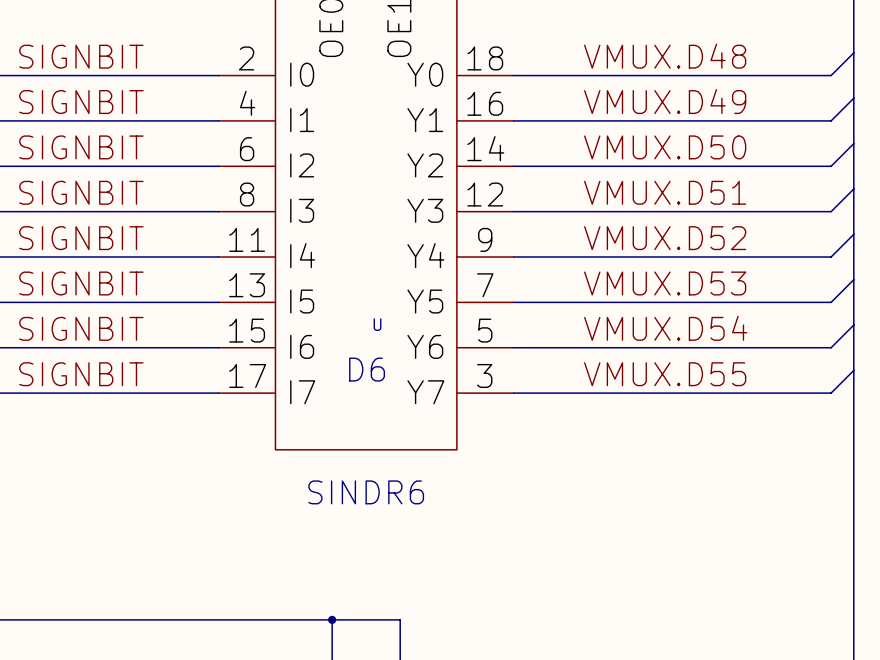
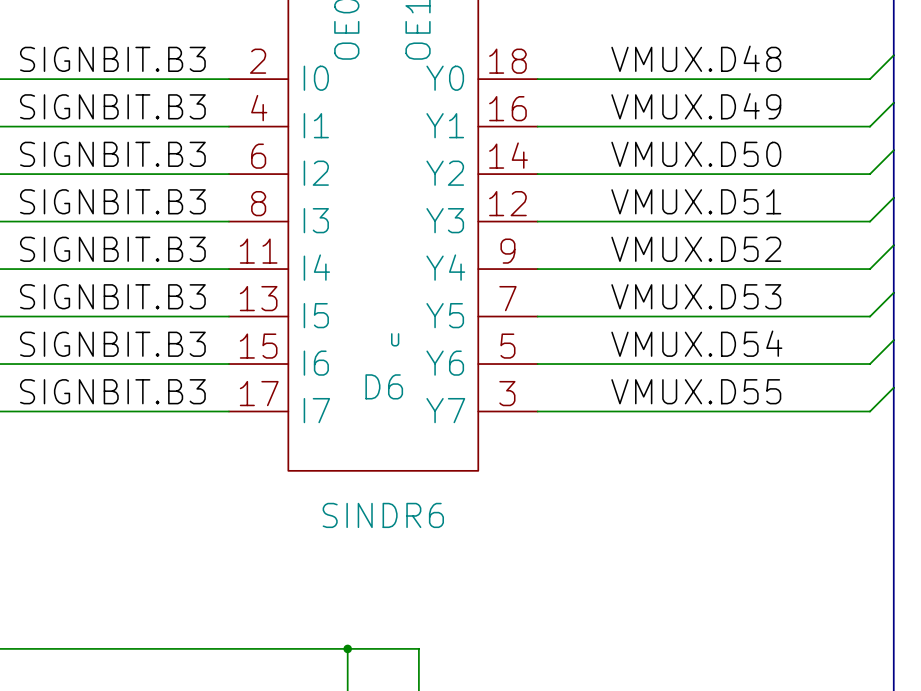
label: SIGNBIT (81, 56) -> SIGNBIT.B3 (112, 59)
label: SIGNBIT (81, 102) -> SIGNBIT.B3 (112, 106)
label: SIGNBIT (81, 147) -> SIGNBIT.B3 (112, 154)
label: SIGNBIT (81, 192) -> SIGNBIT.B3 (112, 201)
label: SIGNBIT (81, 238) -> SIGNBIT.B3 (112, 249)
label: SIGNBIT (81, 283) -> SIGNBIT.B3 (112, 296)
label: SIGNBIT (81, 328) -> SIGNBIT.B3 (112, 344)
label: SIGNBIT (81, 374) -> SIGNBIT.B3 (112, 391)

